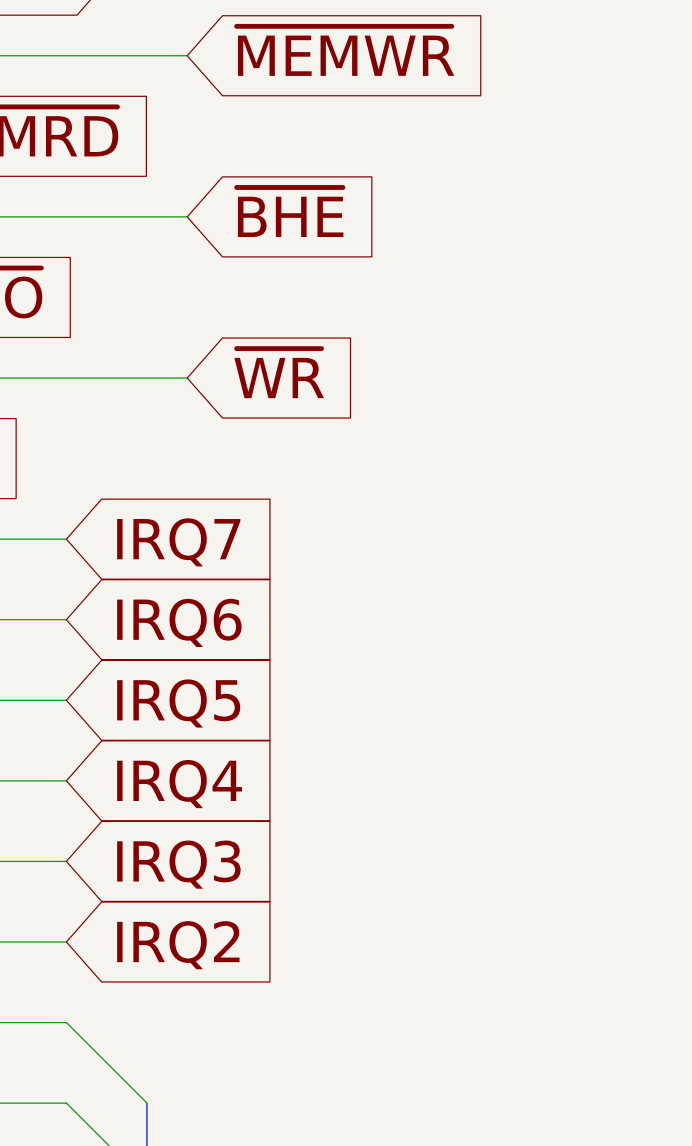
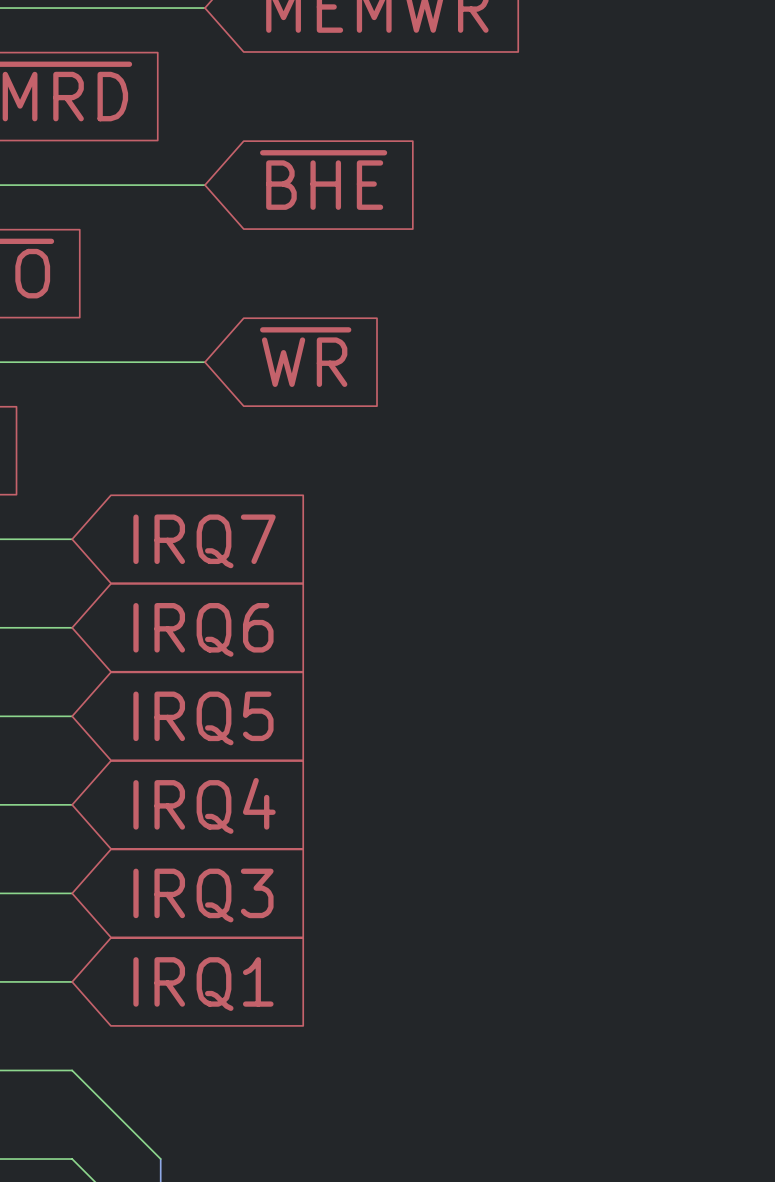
global label: IRQ2 (178, 945) -> IRQ1 (203, 984)

